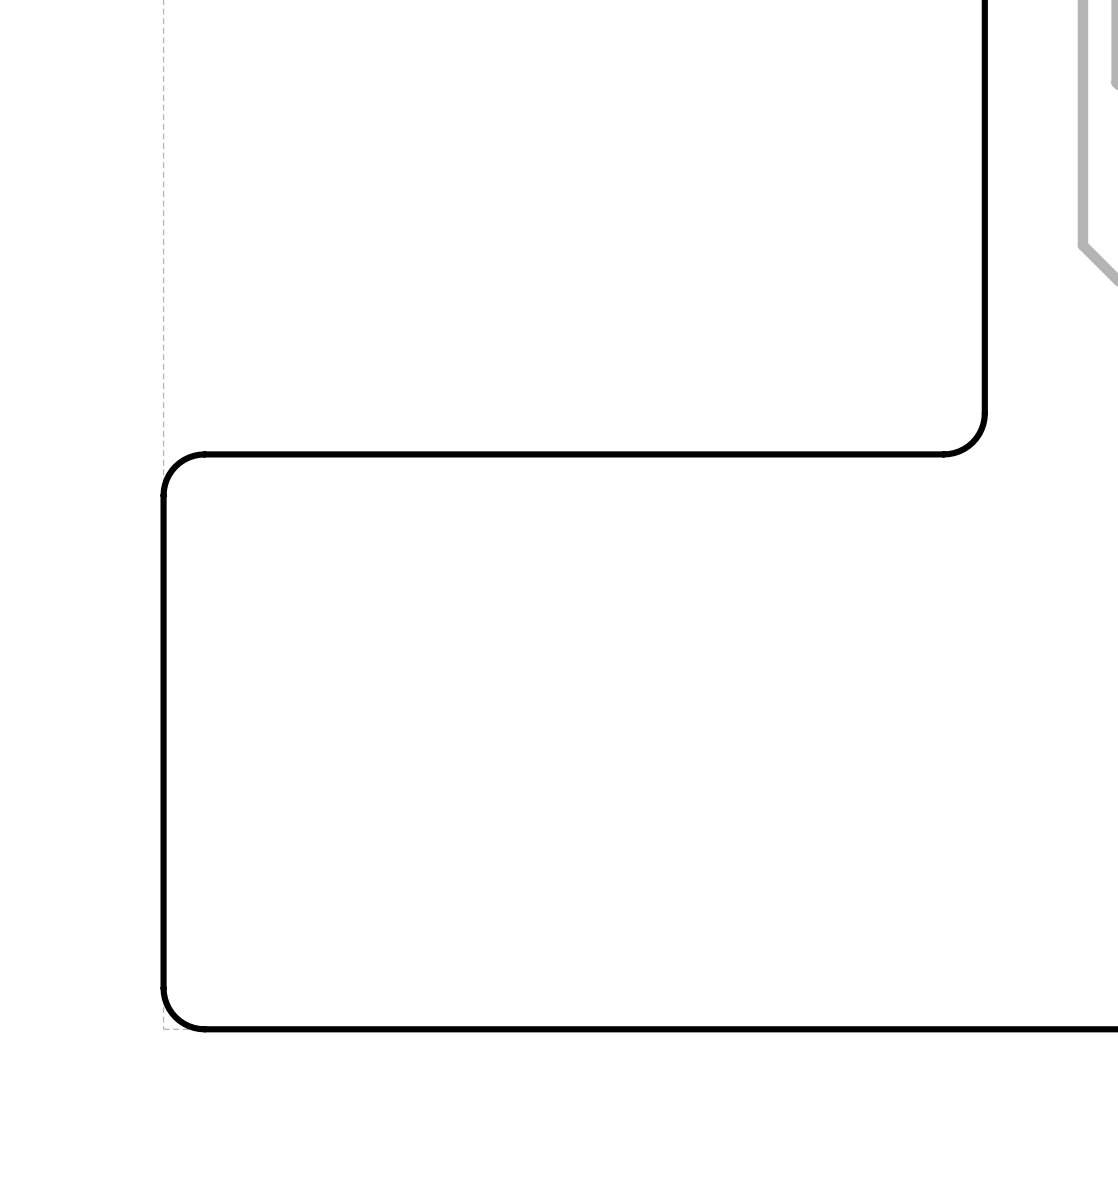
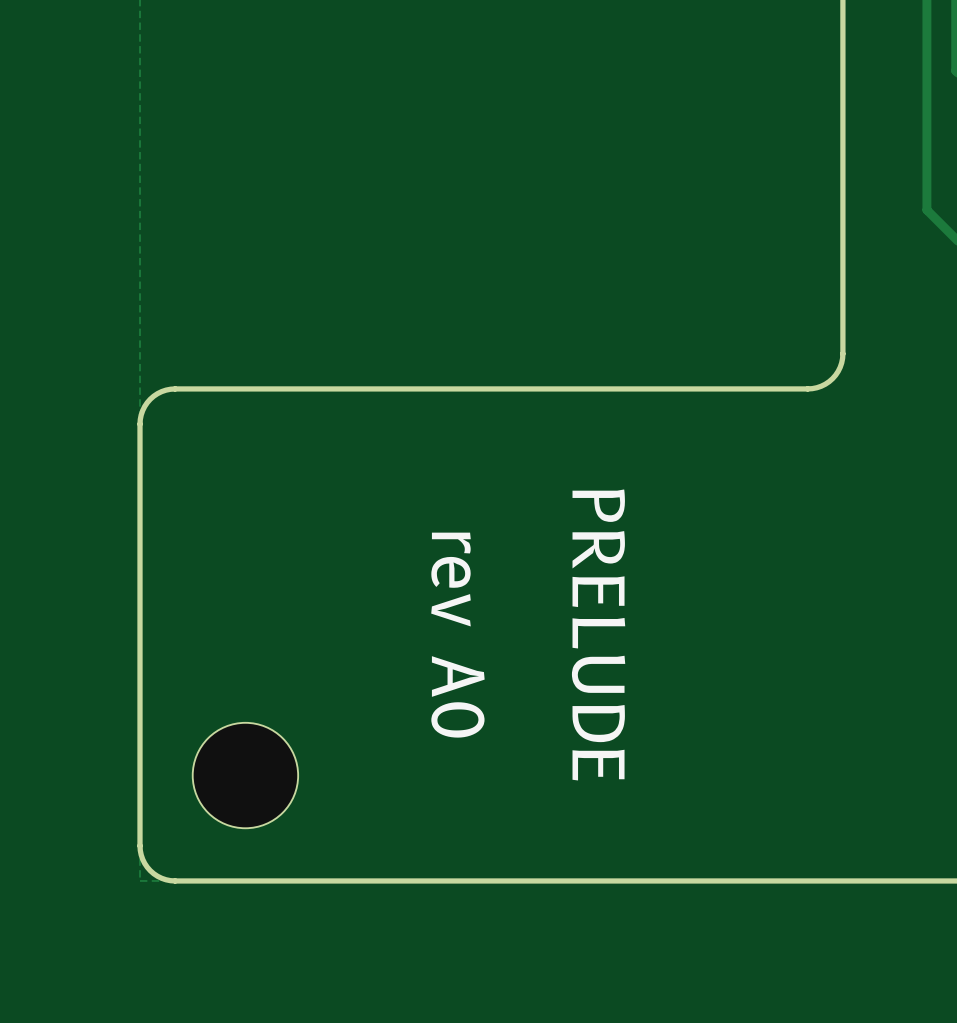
text: none -> rev A0 (457, 635)
text: none -> PRELUDE (598, 634)
part: none -> (245, 775)

